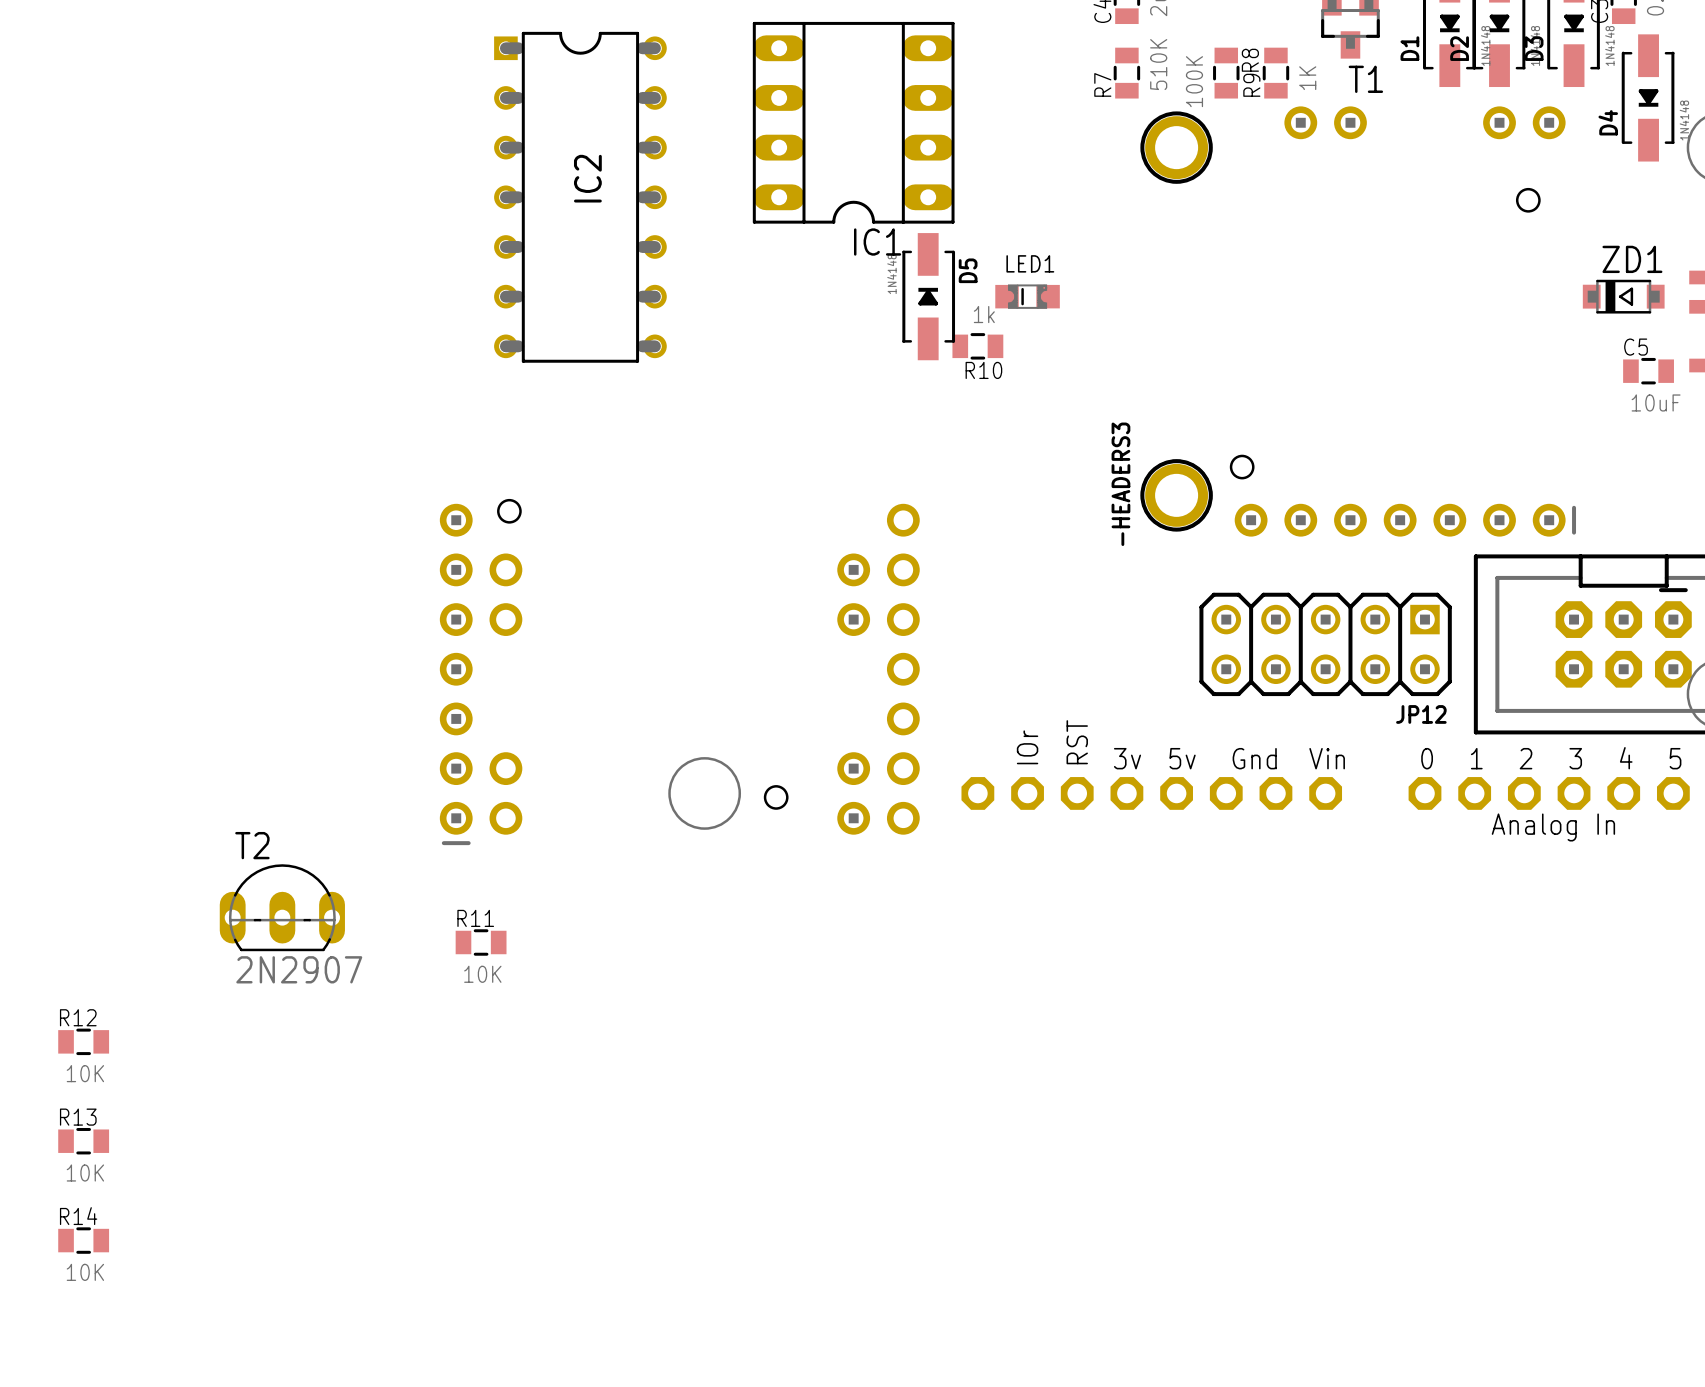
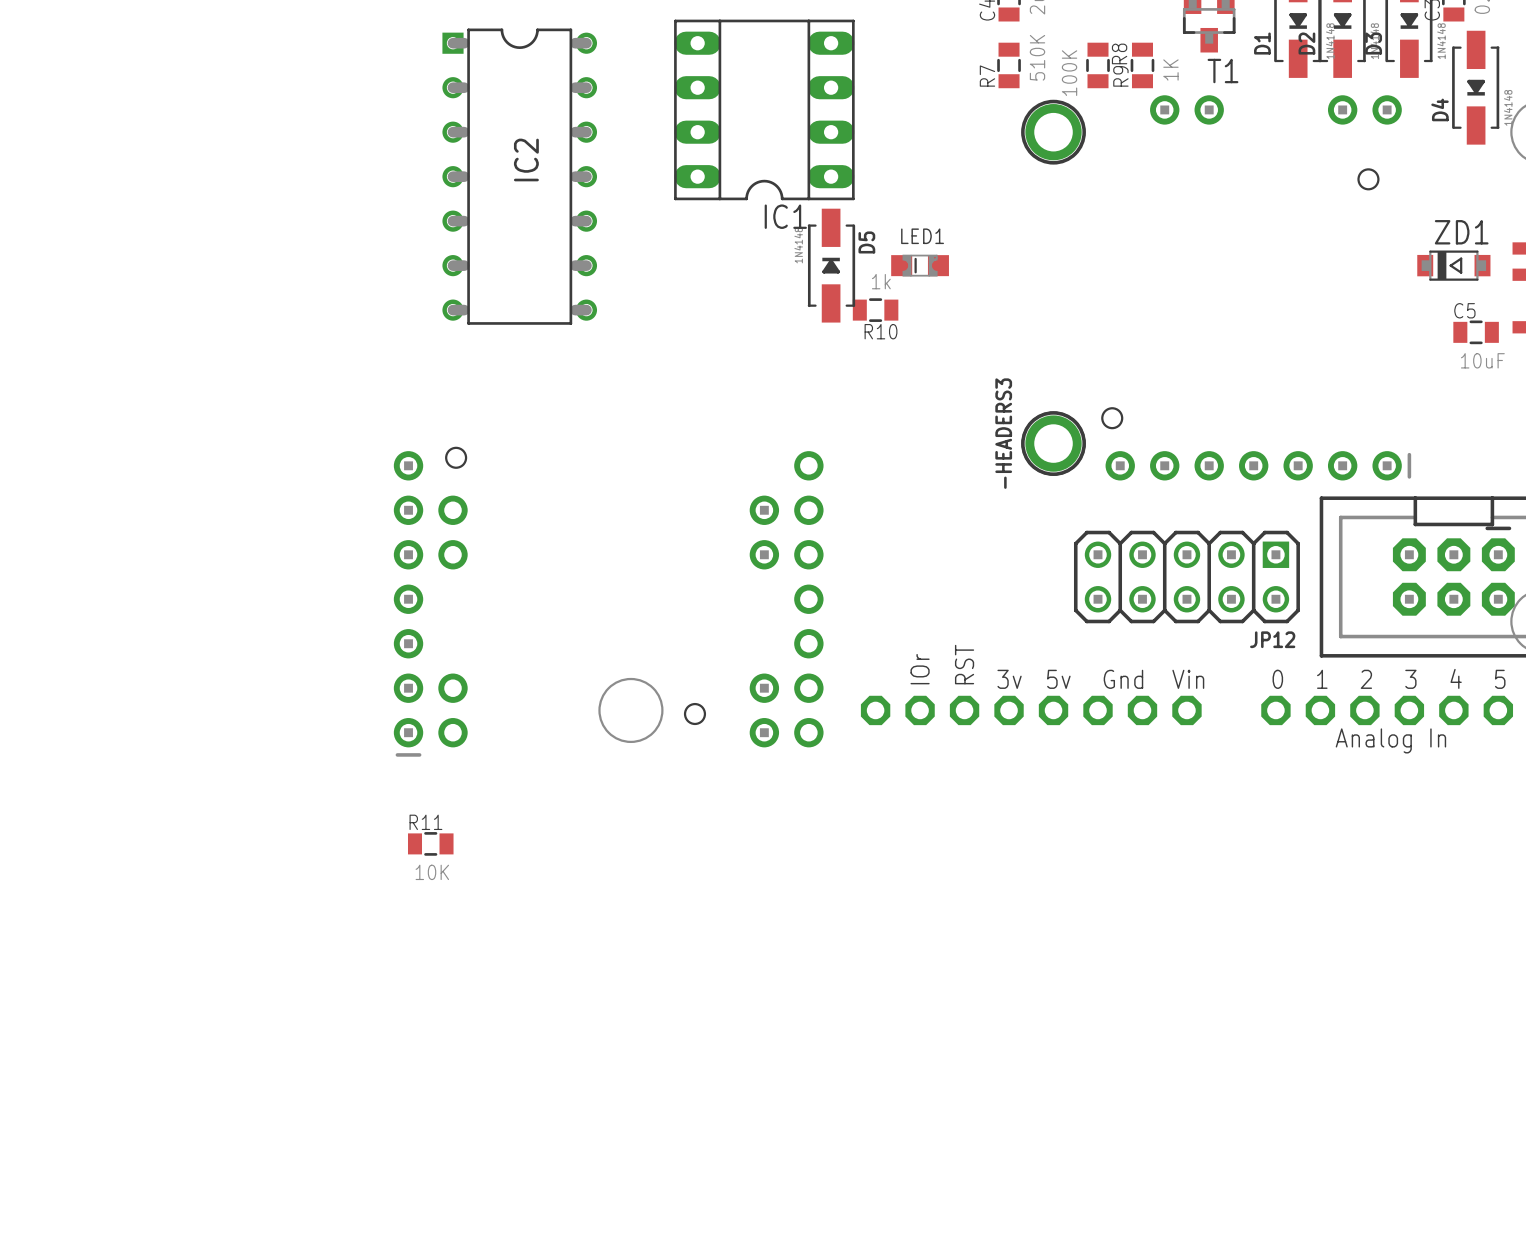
T2: 2N2907 (282, 907) -> none
R12: 10K (83, 1041) -> none
R13: 10K (83, 1141) -> none
R14: 10K (83, 1240) -> none

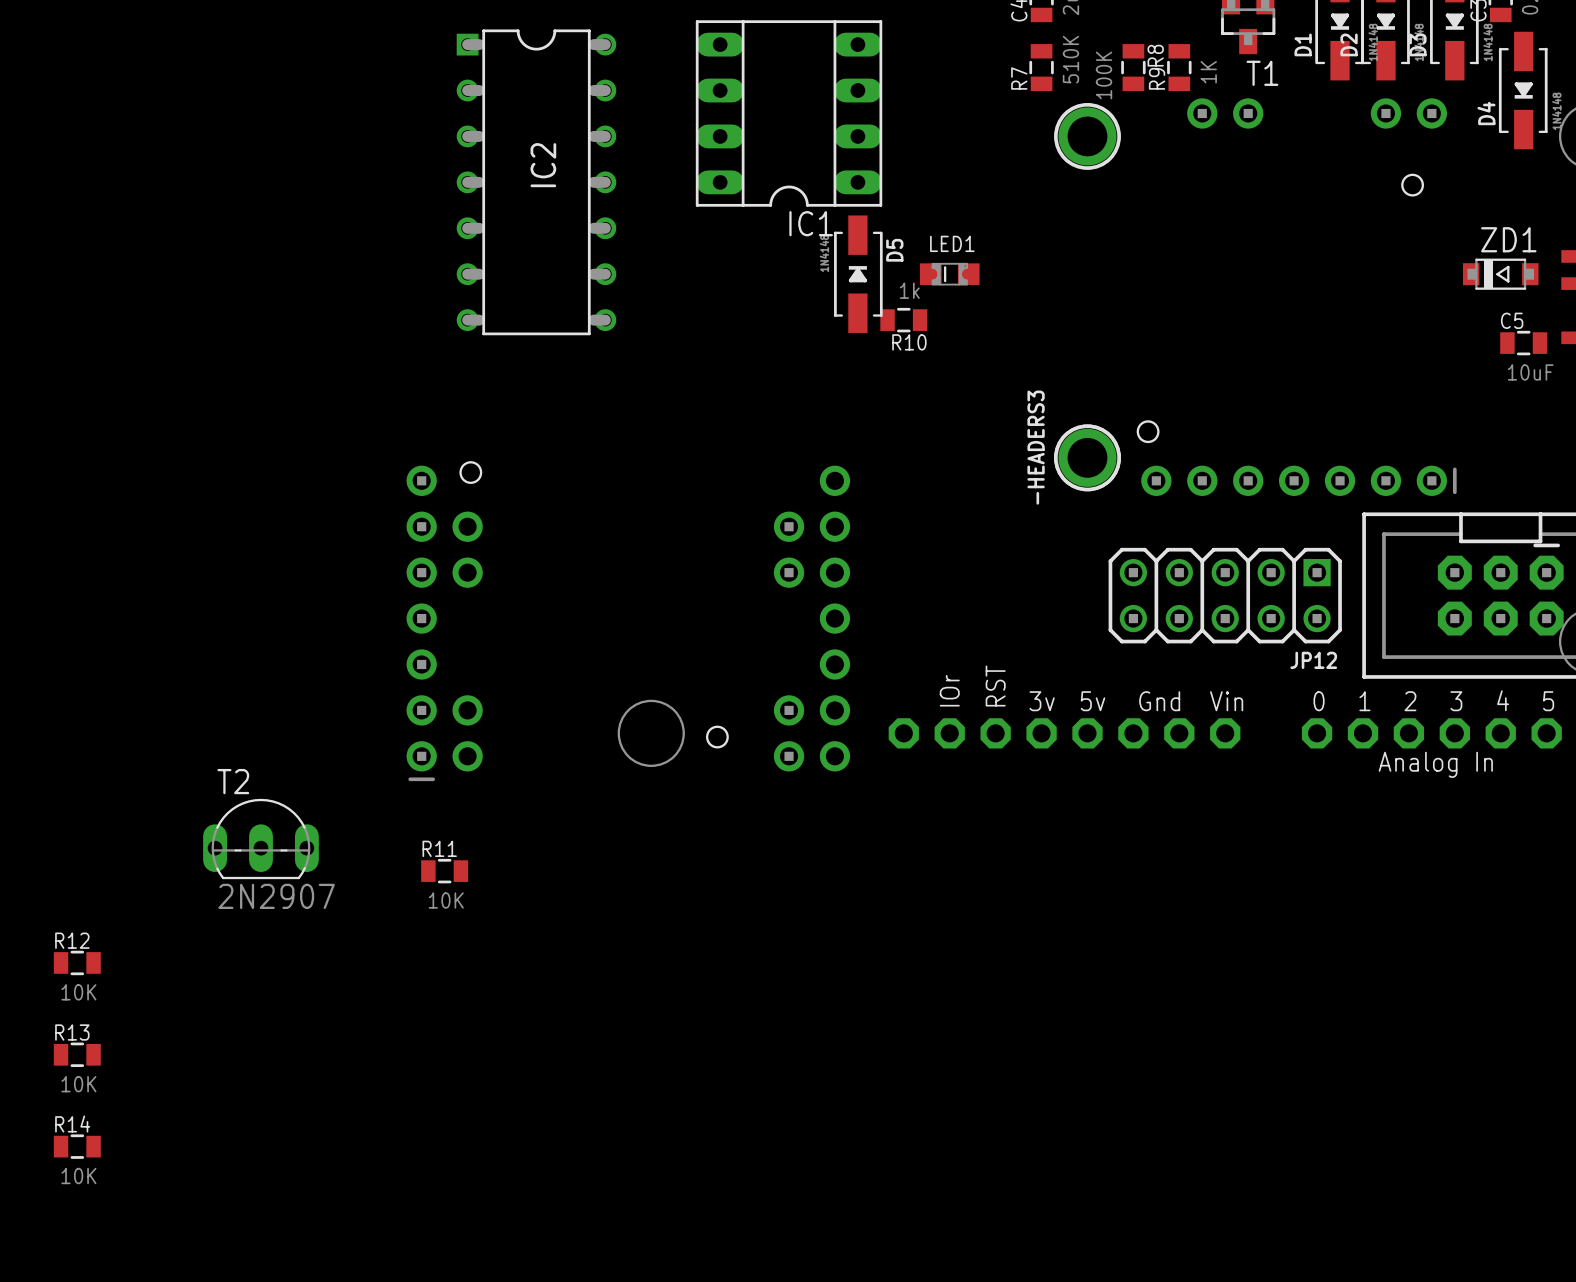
T2: none -> 2N2907 (260, 838)
R12: none -> 10K (77, 962)
R13: none -> 10K (77, 1054)
R14: none -> 10K (77, 1146)

